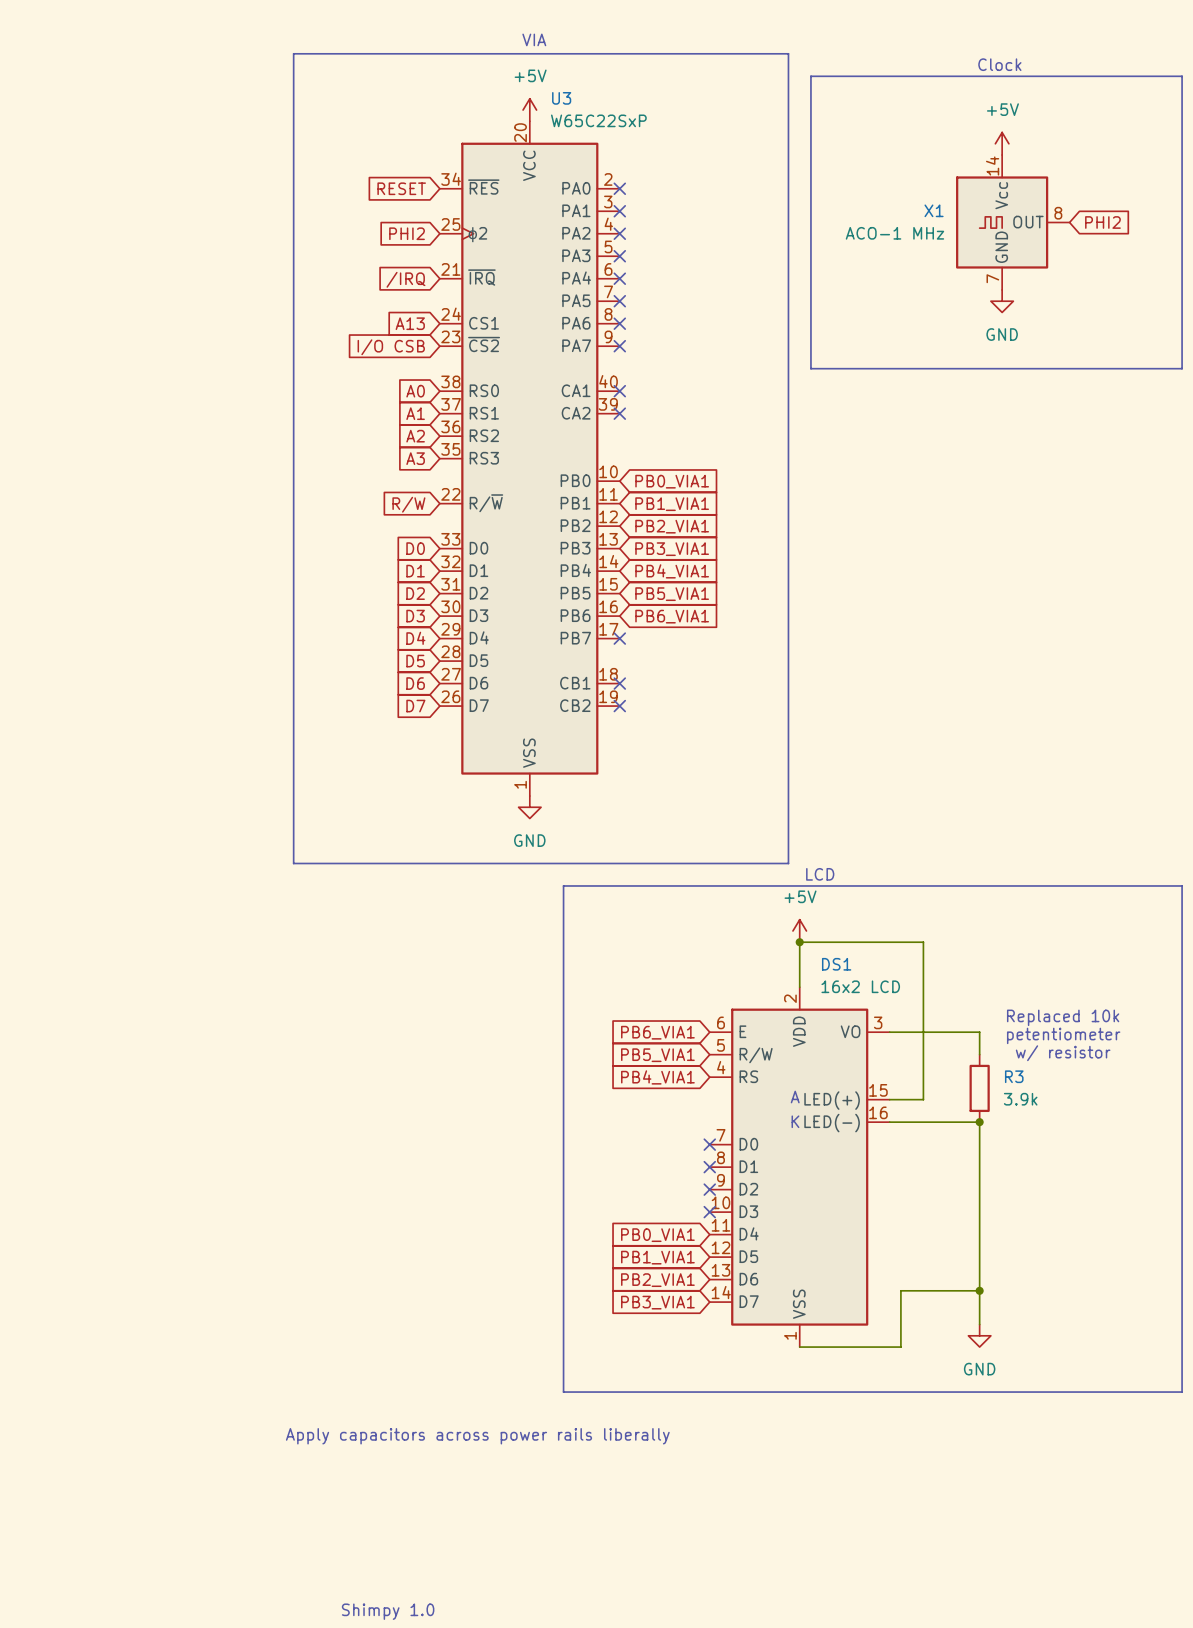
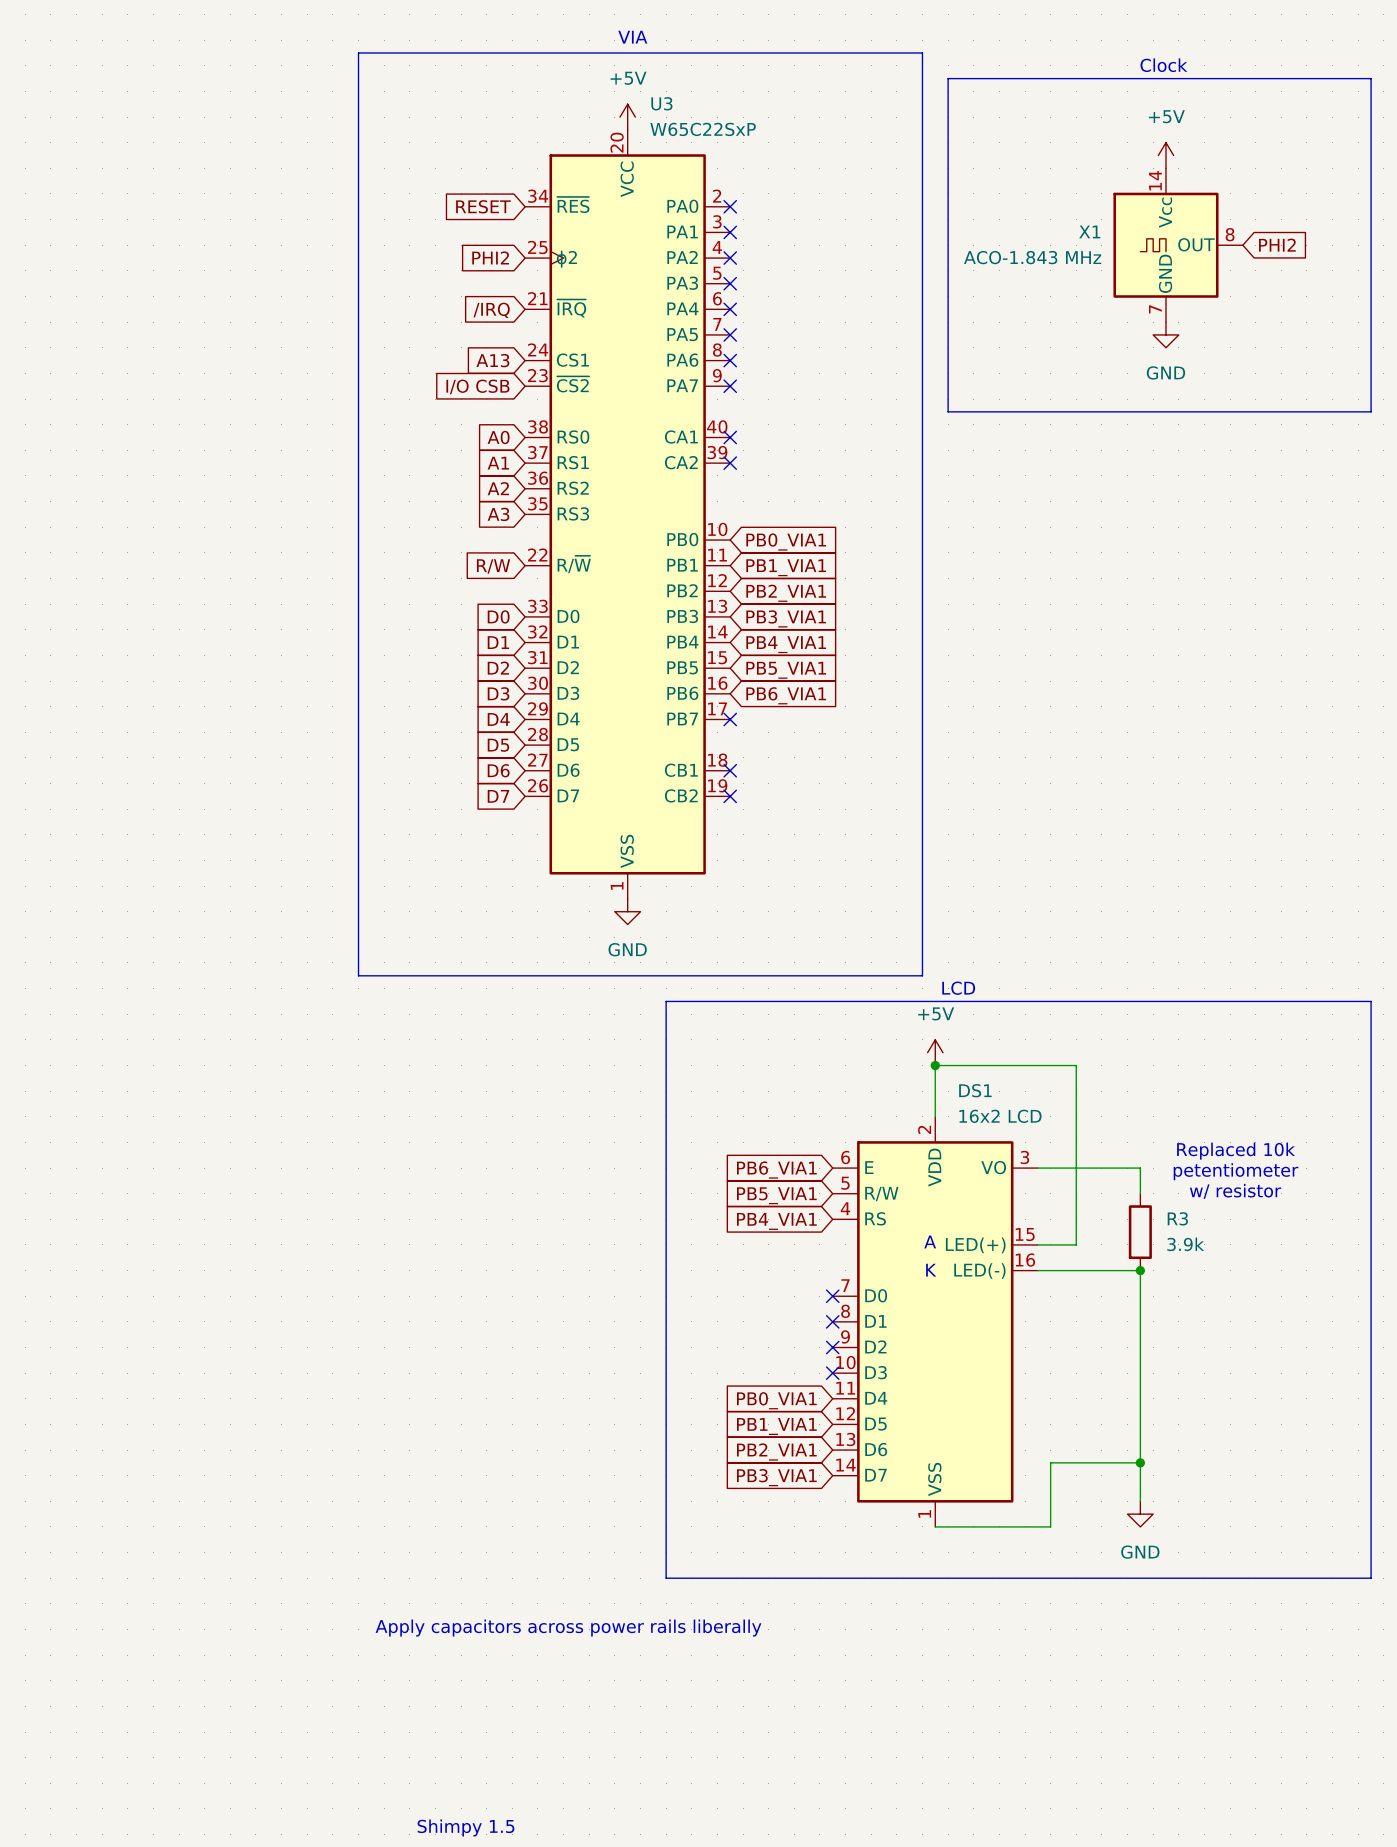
X1 value: ACO-1 MHz (894, 233) -> ACO-1.843 MHz (1032, 257)
text: Shimpy 1.0 (388, 1611) -> Shimpy 1.5 (465, 1827)

